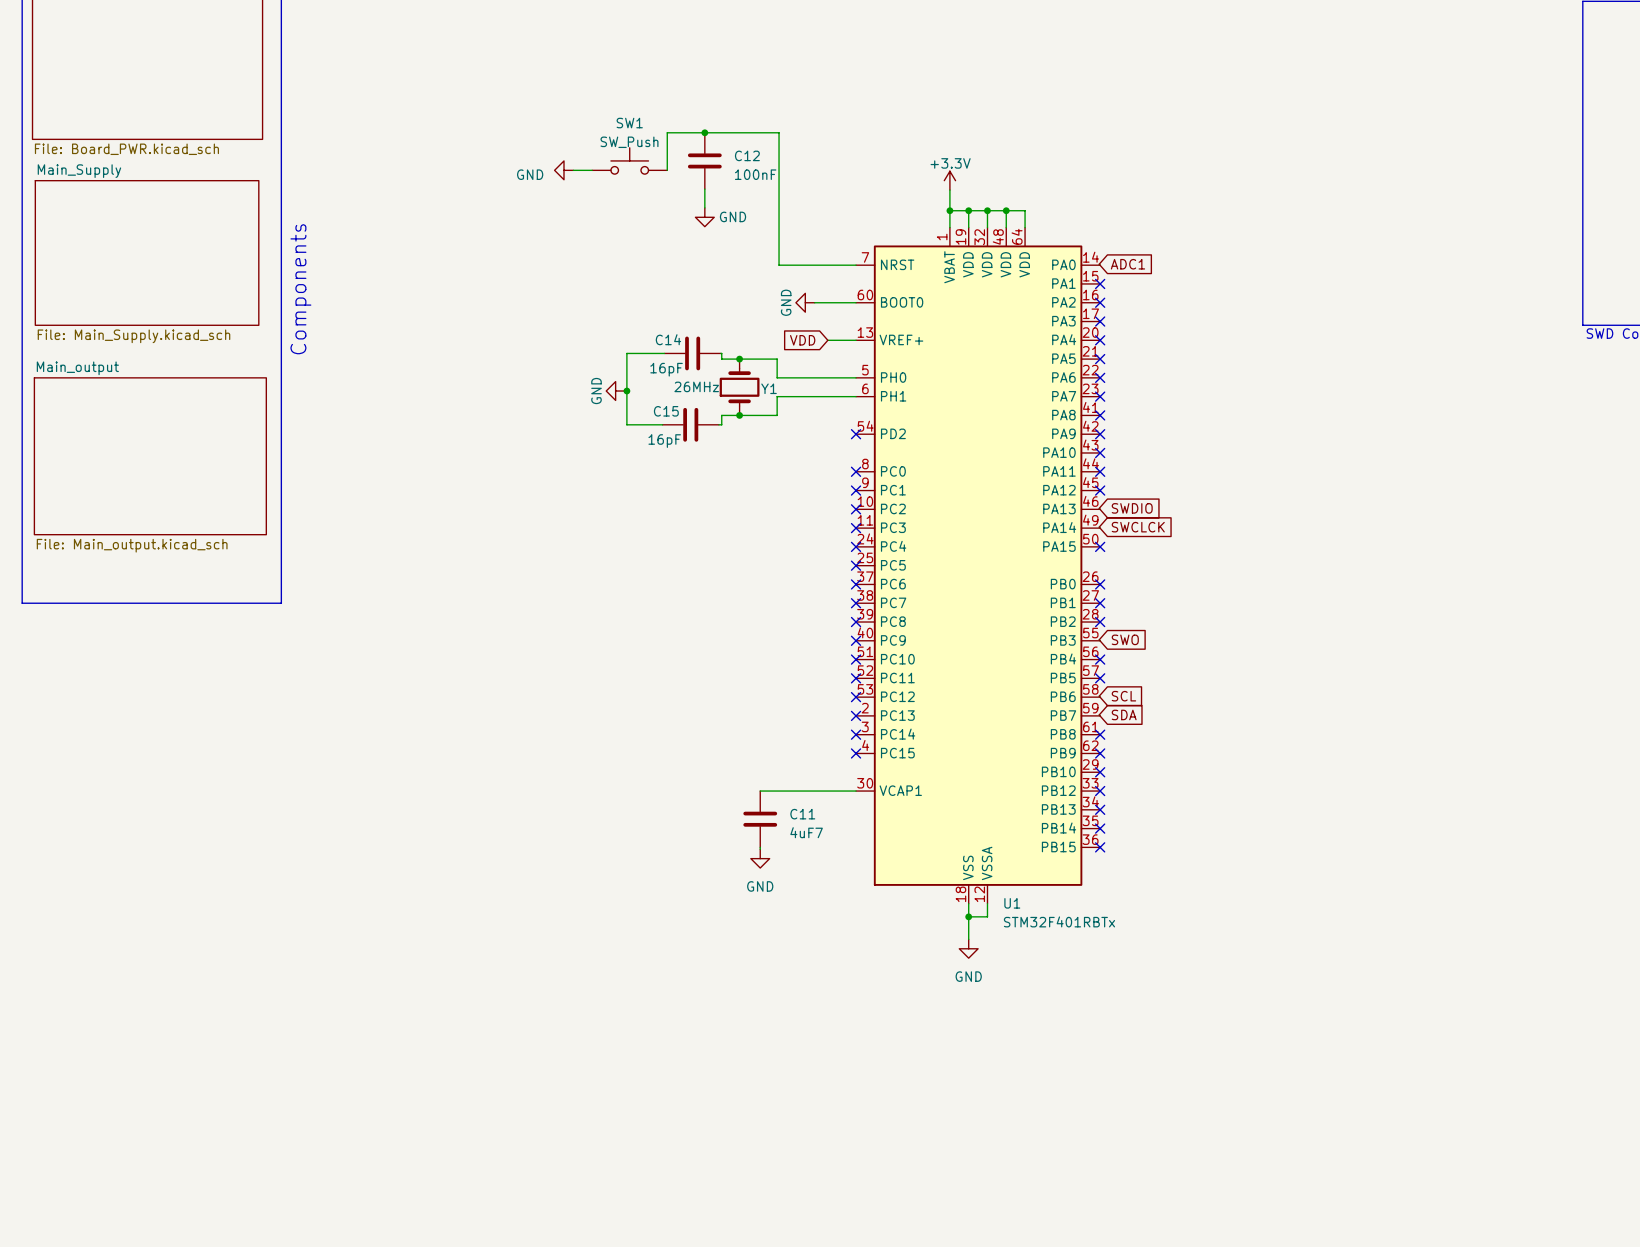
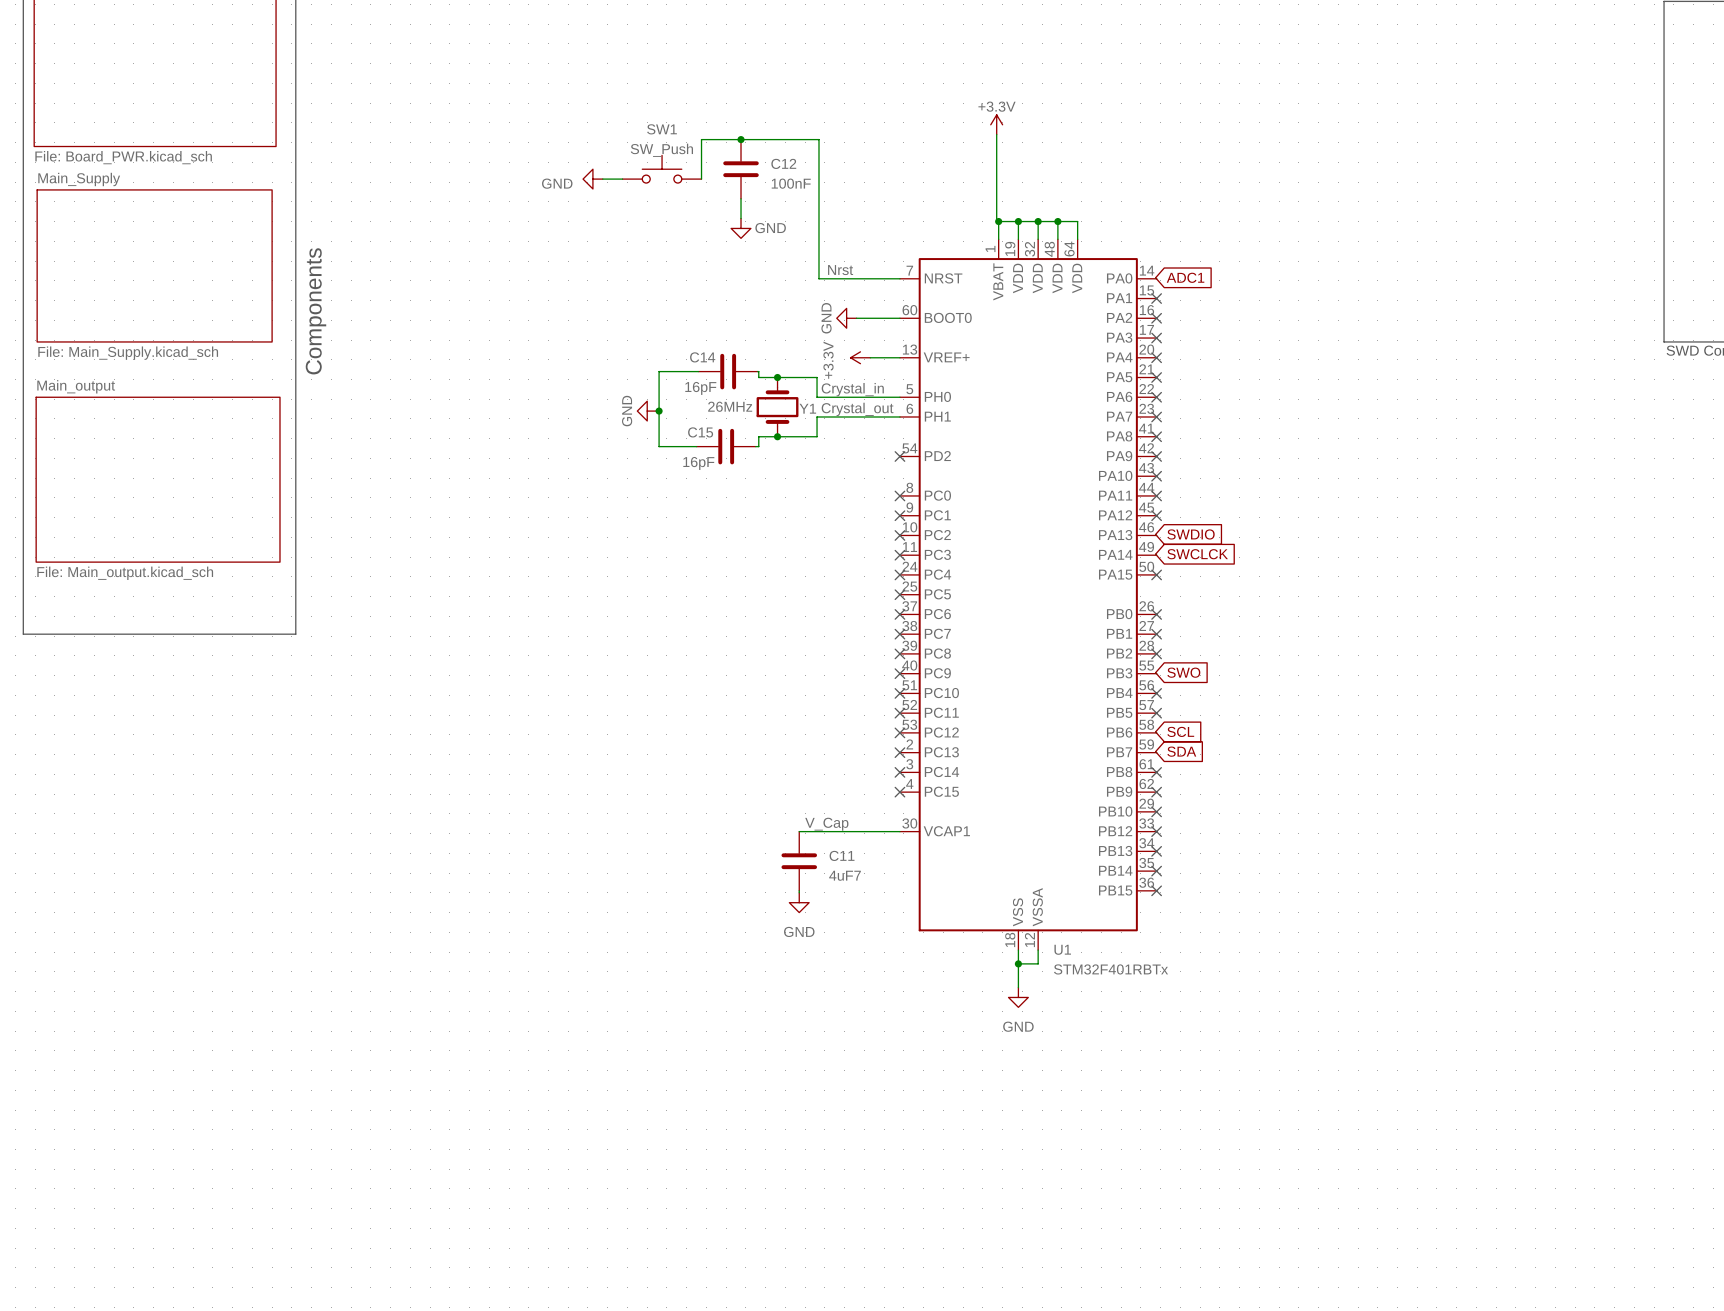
power symbol position: +3.3V (949, 180) -> +3.3V (996, 124)
wire: (949, 190) (949, 210) -> (996, 134) (996, 221) (998, 221)
label: none -> Nrst (840, 270)
global label: VDD (802, 340) -> none
power symbol: none -> +3.3V (860, 357)
label: none -> Crystal_in (852, 389)
label: none -> Crystal_out (857, 409)
label: none -> V_Cap (826, 824)

